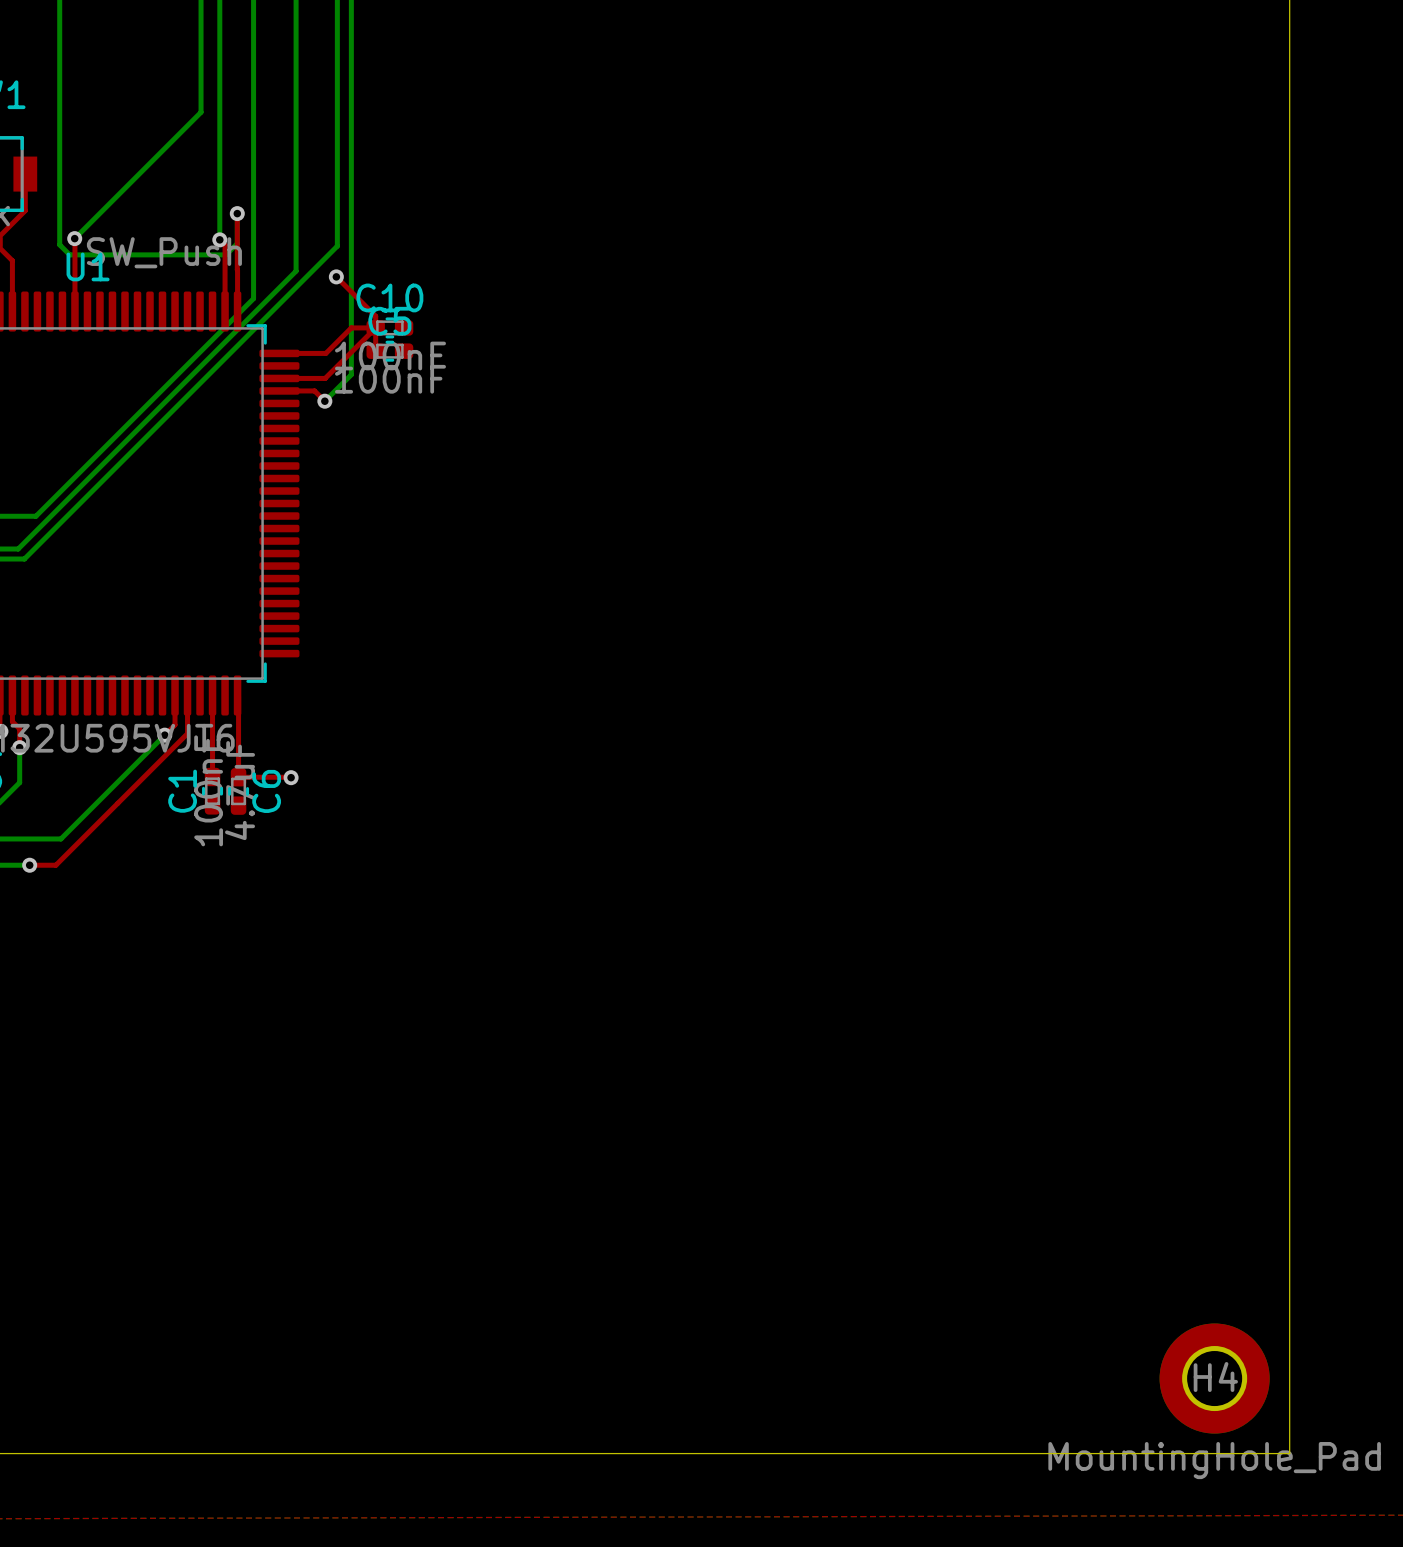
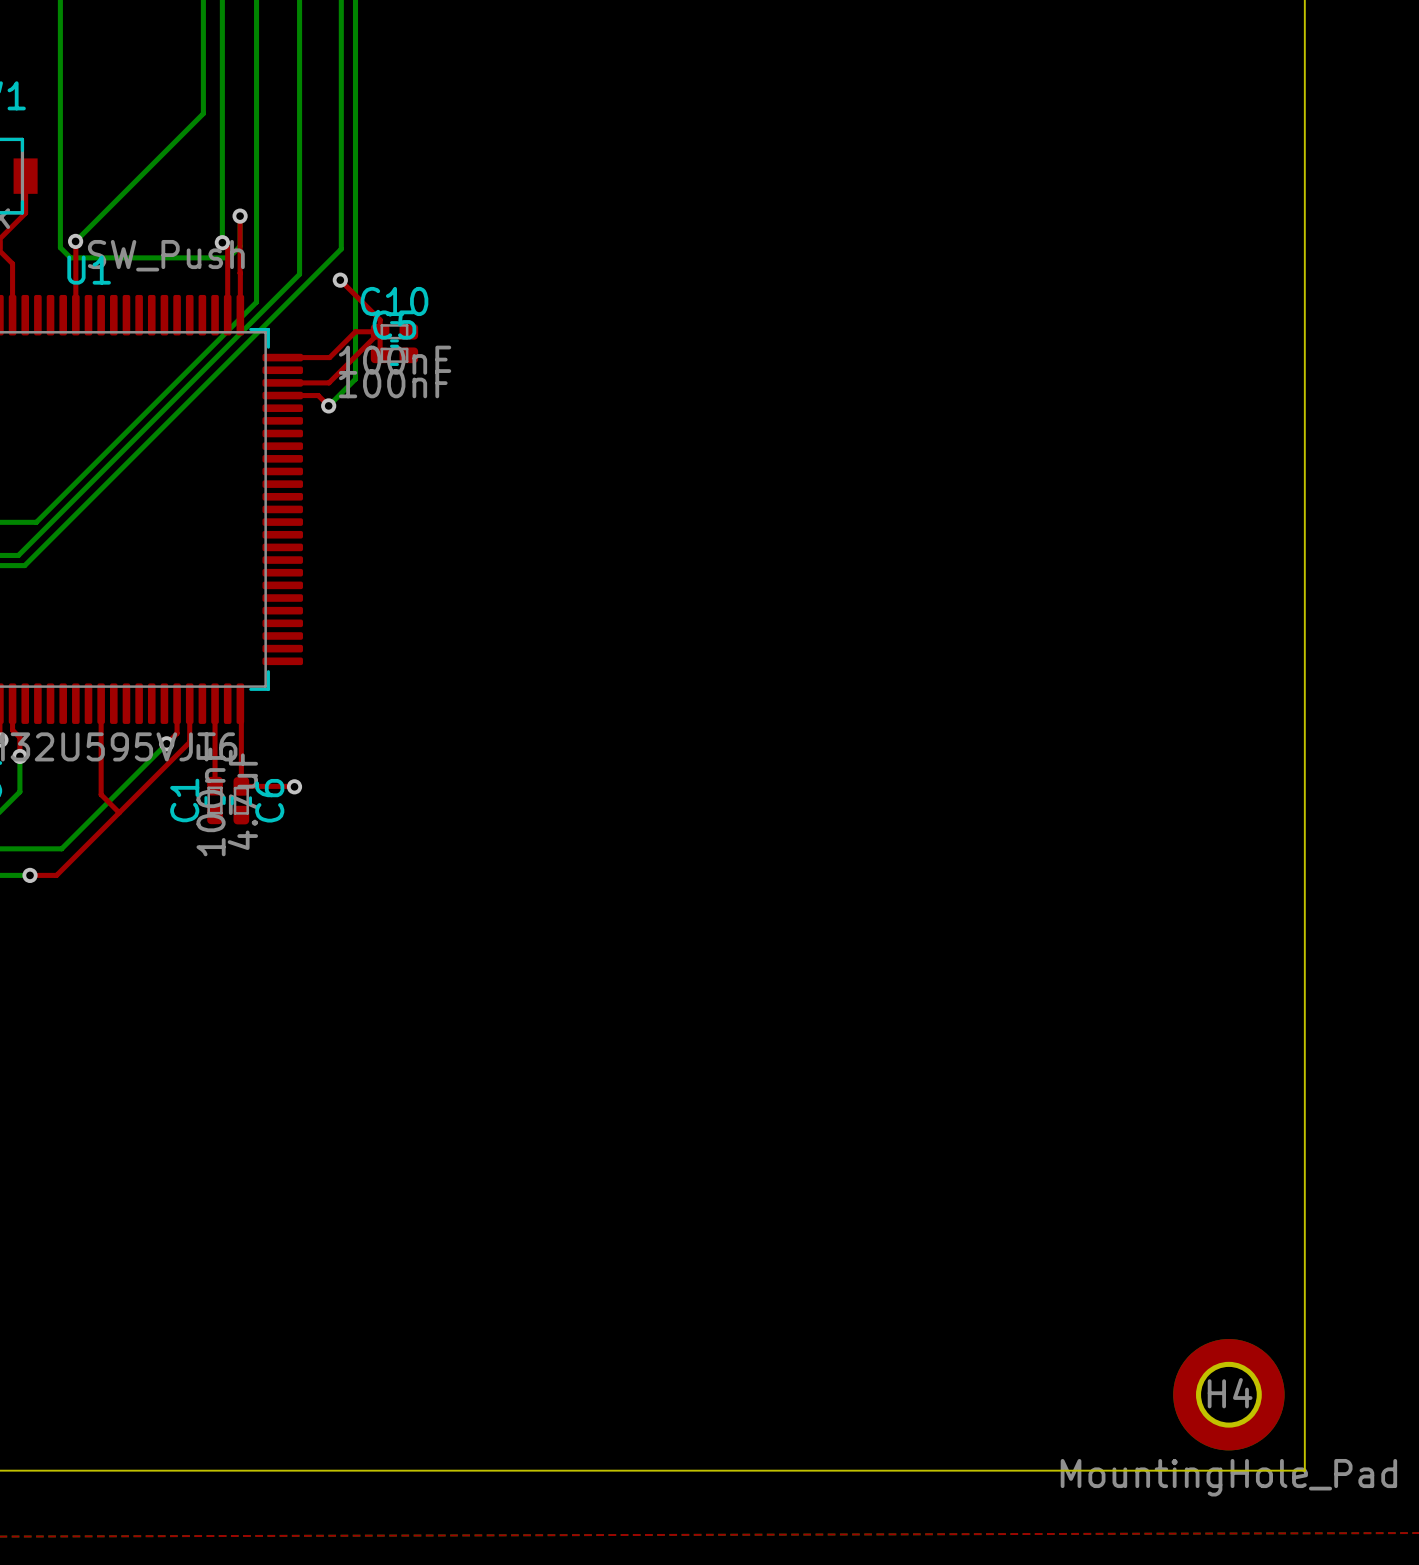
top track: none -> (101, 703) (101, 794) (119, 812)

